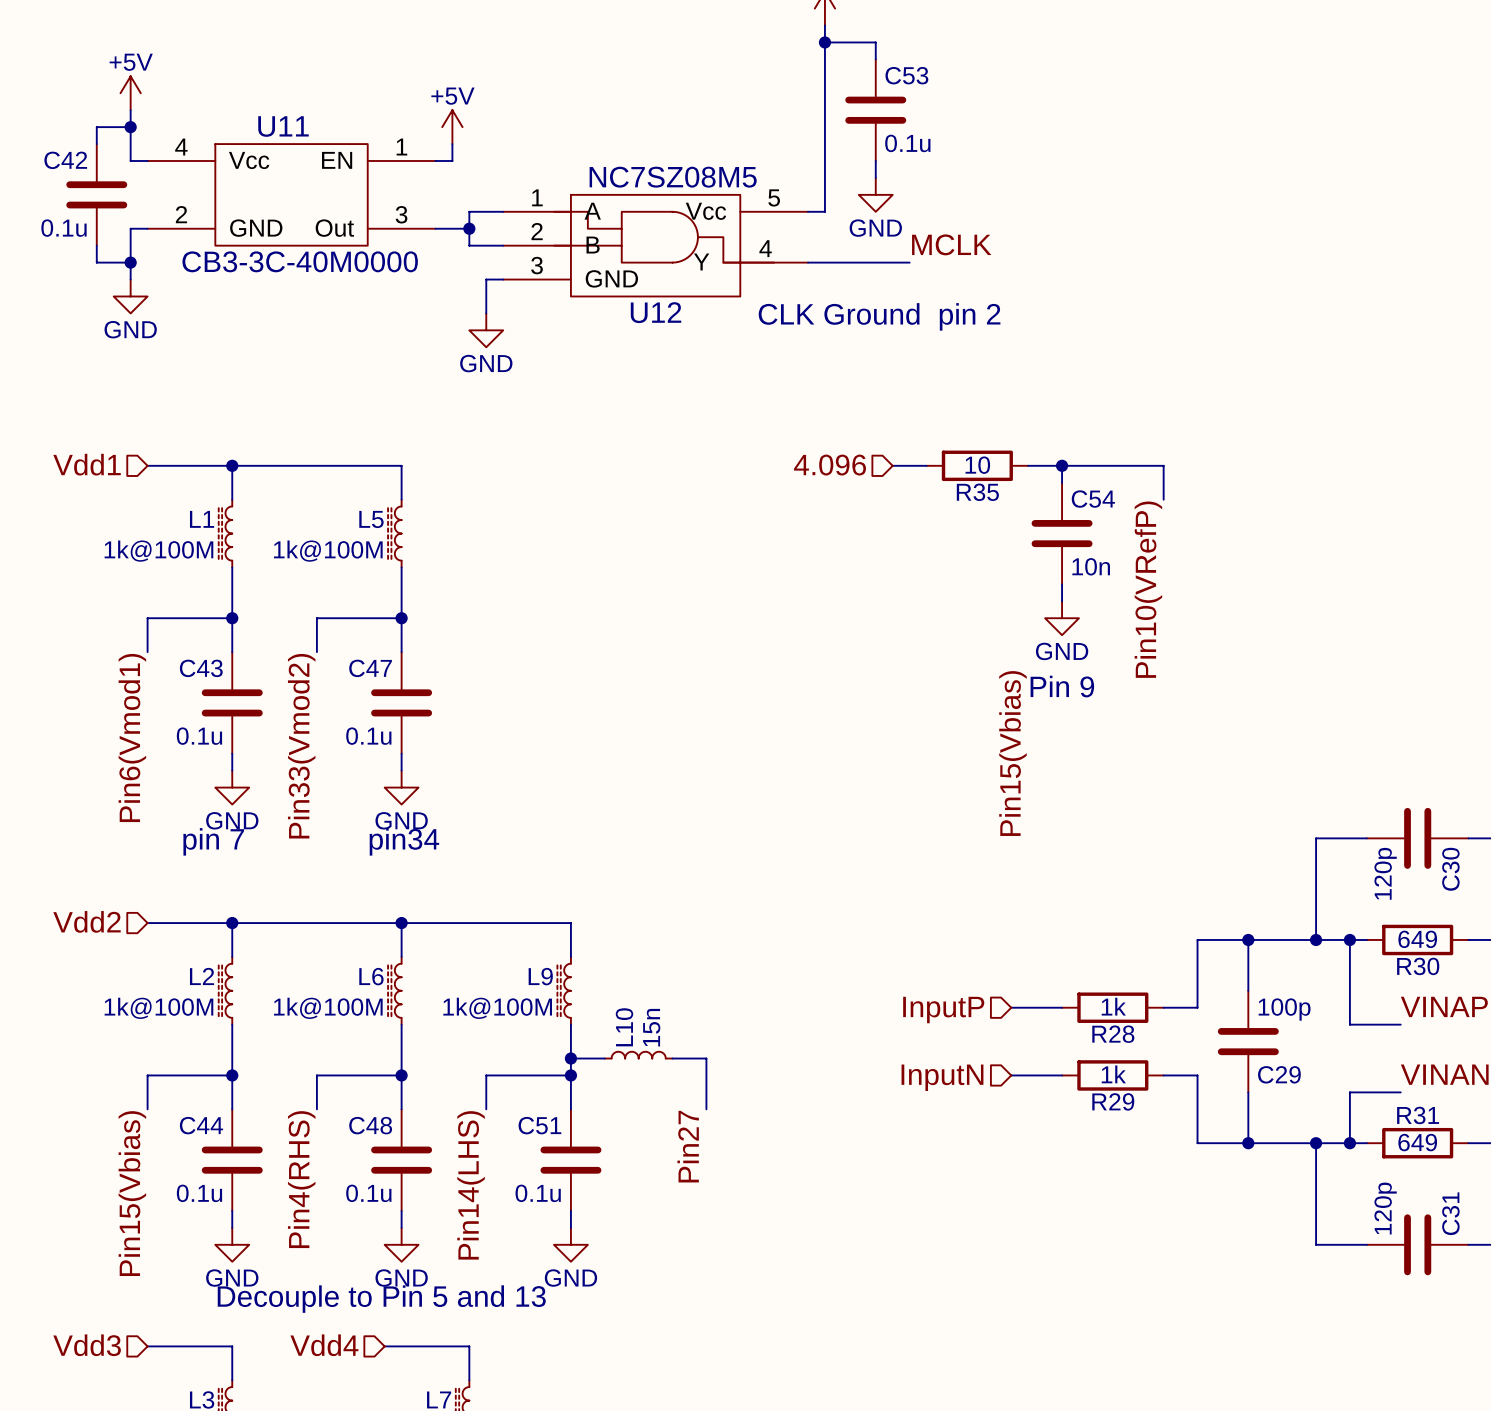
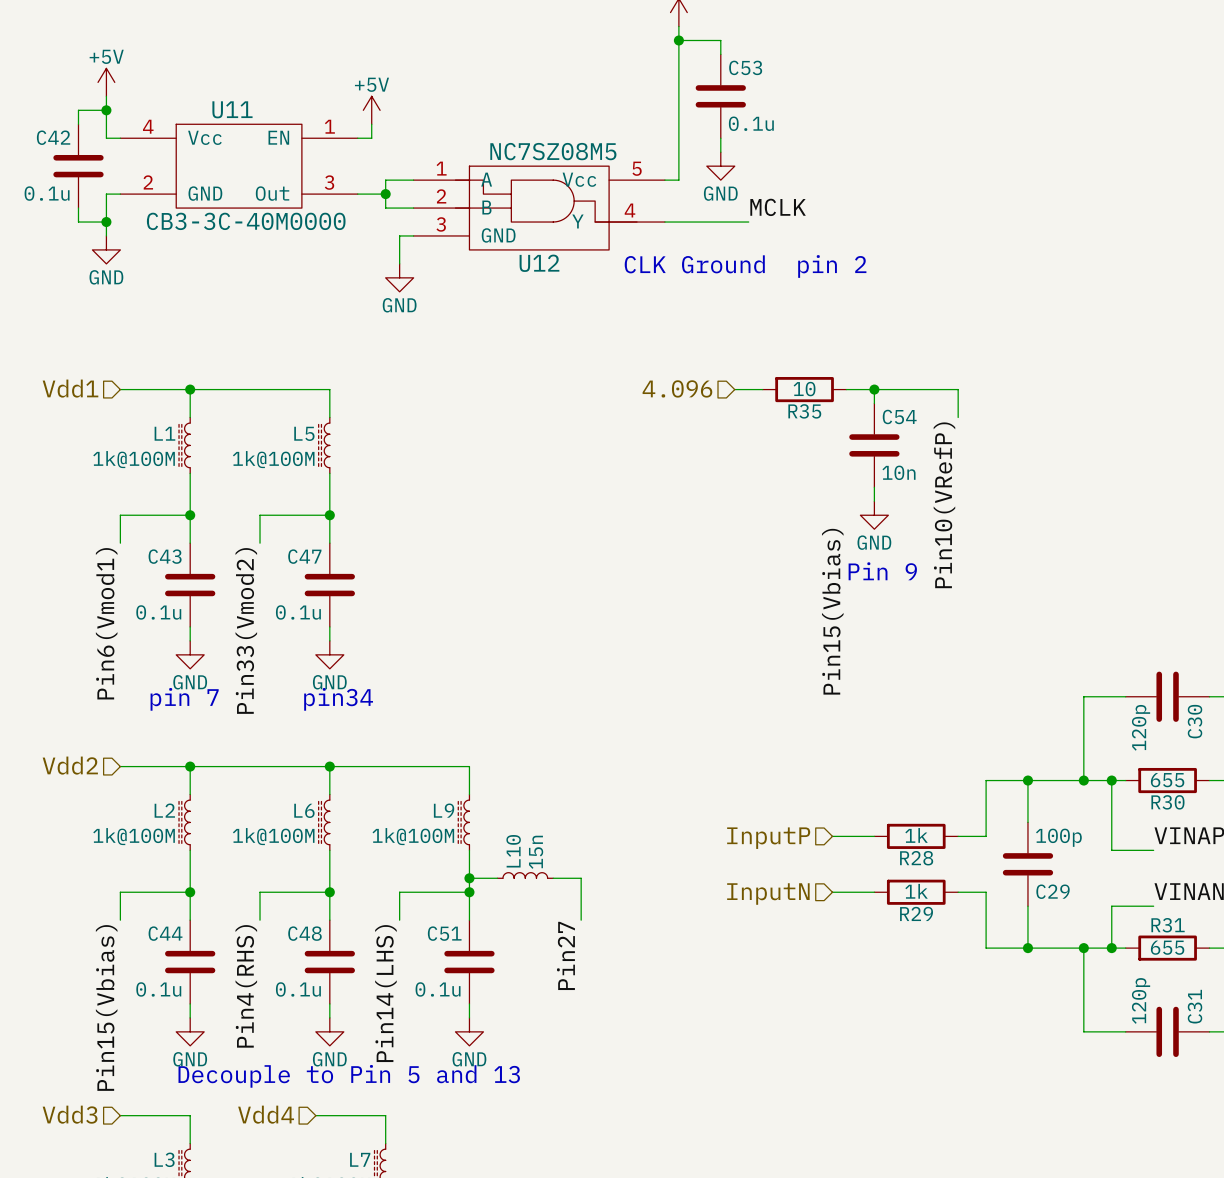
R30 value: 649 (1417, 939) -> 655 (1167, 780)
R31 value: 649 (1417, 1142) -> 655 (1167, 947)

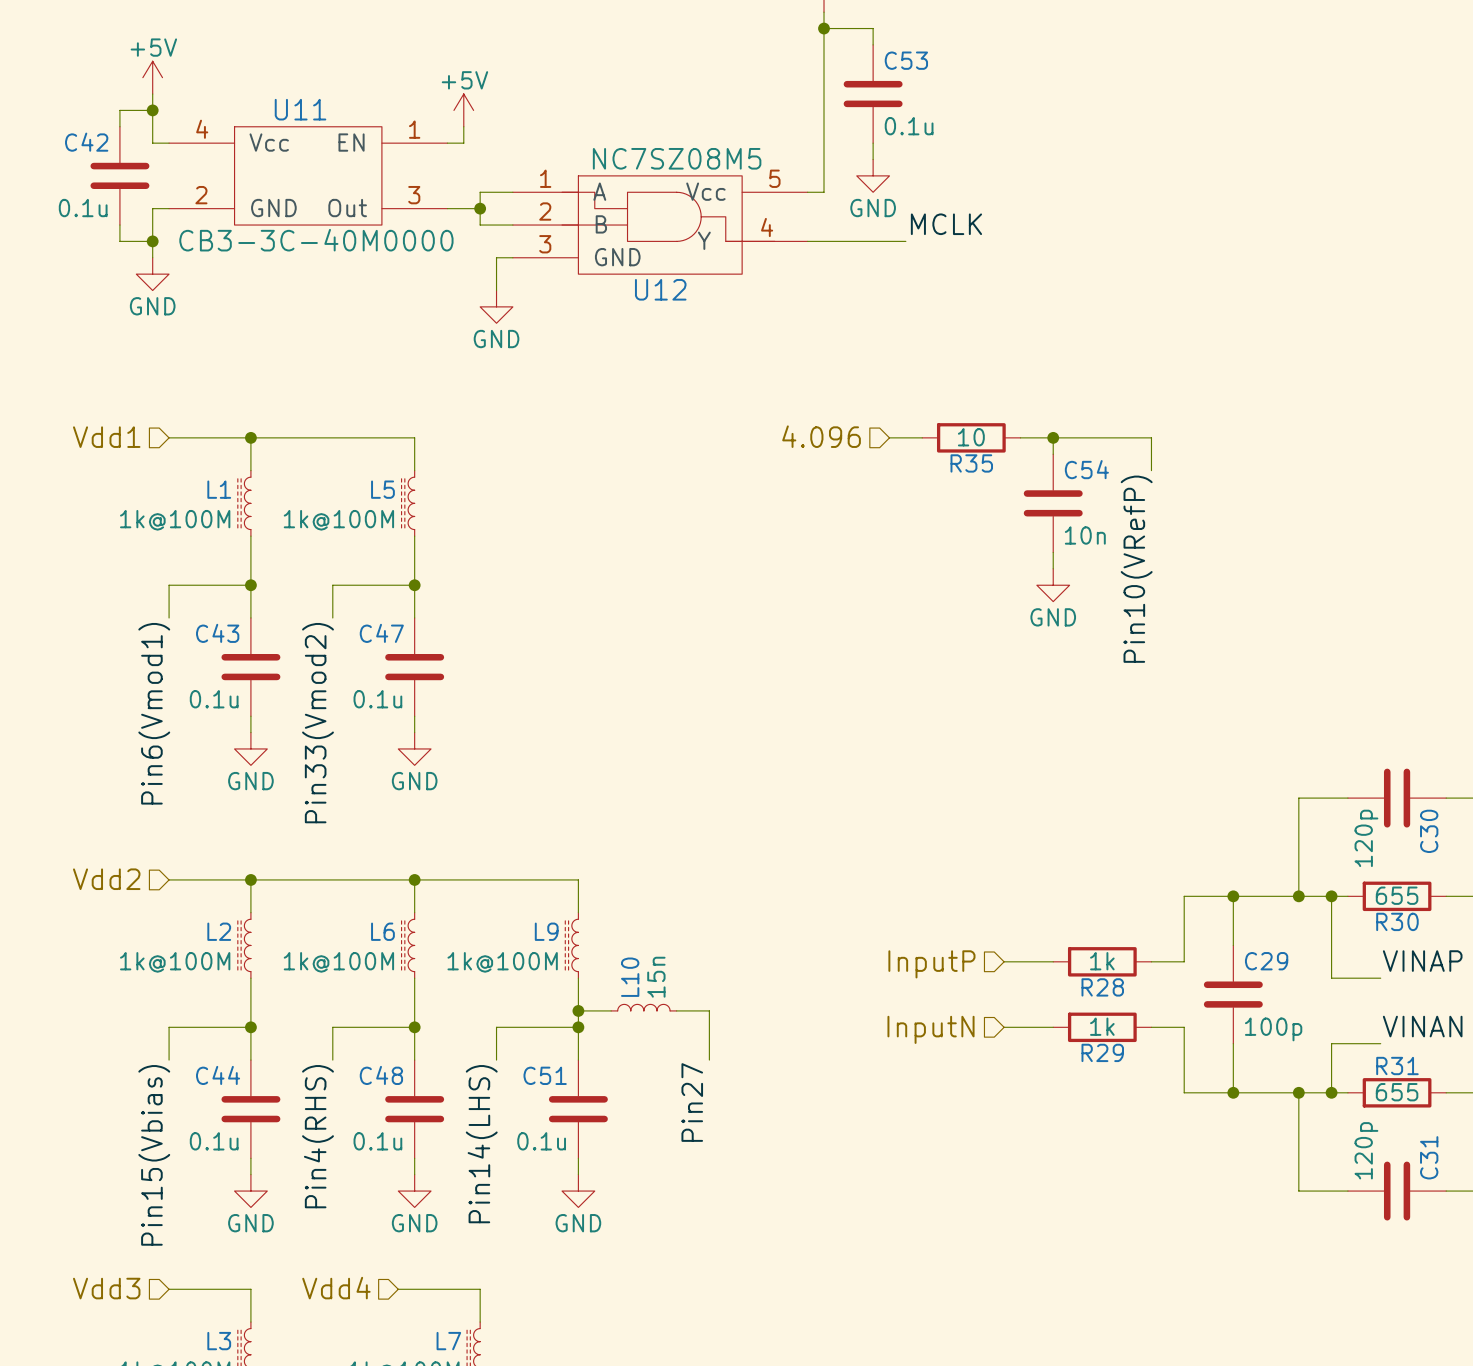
text: CLK Ground pin 2 (745, 266) -> none
text: Pin 9 (882, 571) -> none
label: Pin15(Vbias) (832, 611) -> none
text: pin 7 (184, 699) -> none
text: pin34 (338, 699) -> none
C29 value position: 100p (1058, 837) -> 100p (1273, 1029)
C29 name position: C29 (1053, 891) -> C29 (1266, 961)
text: Decouple to Pin 5 and 13 (349, 1076) -> none

